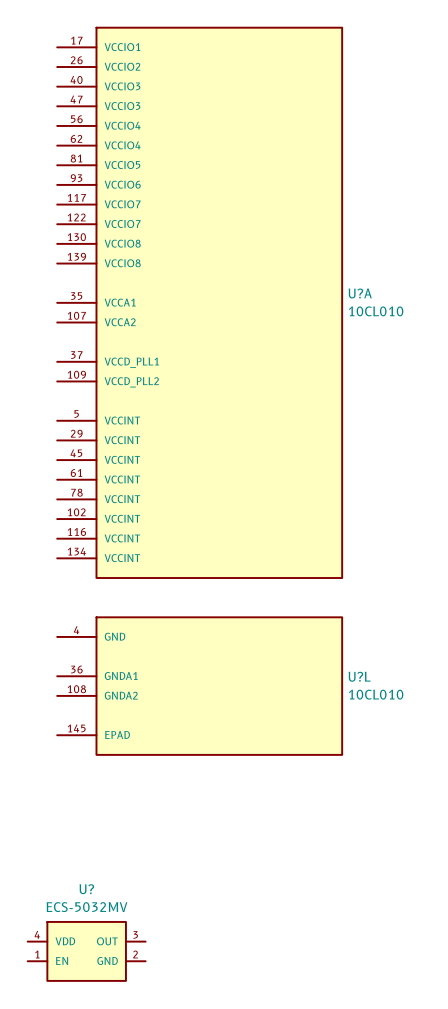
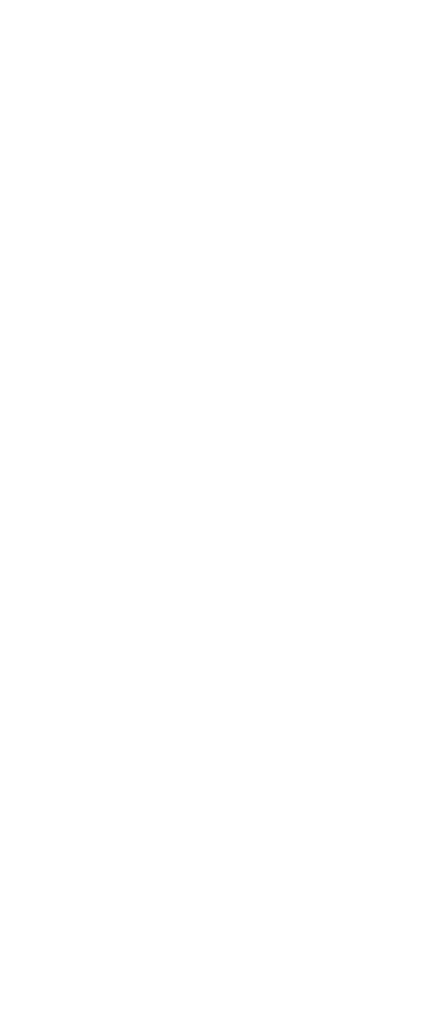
U?A: 10CL010 (199, 302) -> none
U?L: 10CL010 (199, 686) -> none
U?: ECS-5032MV (86, 951) -> none

